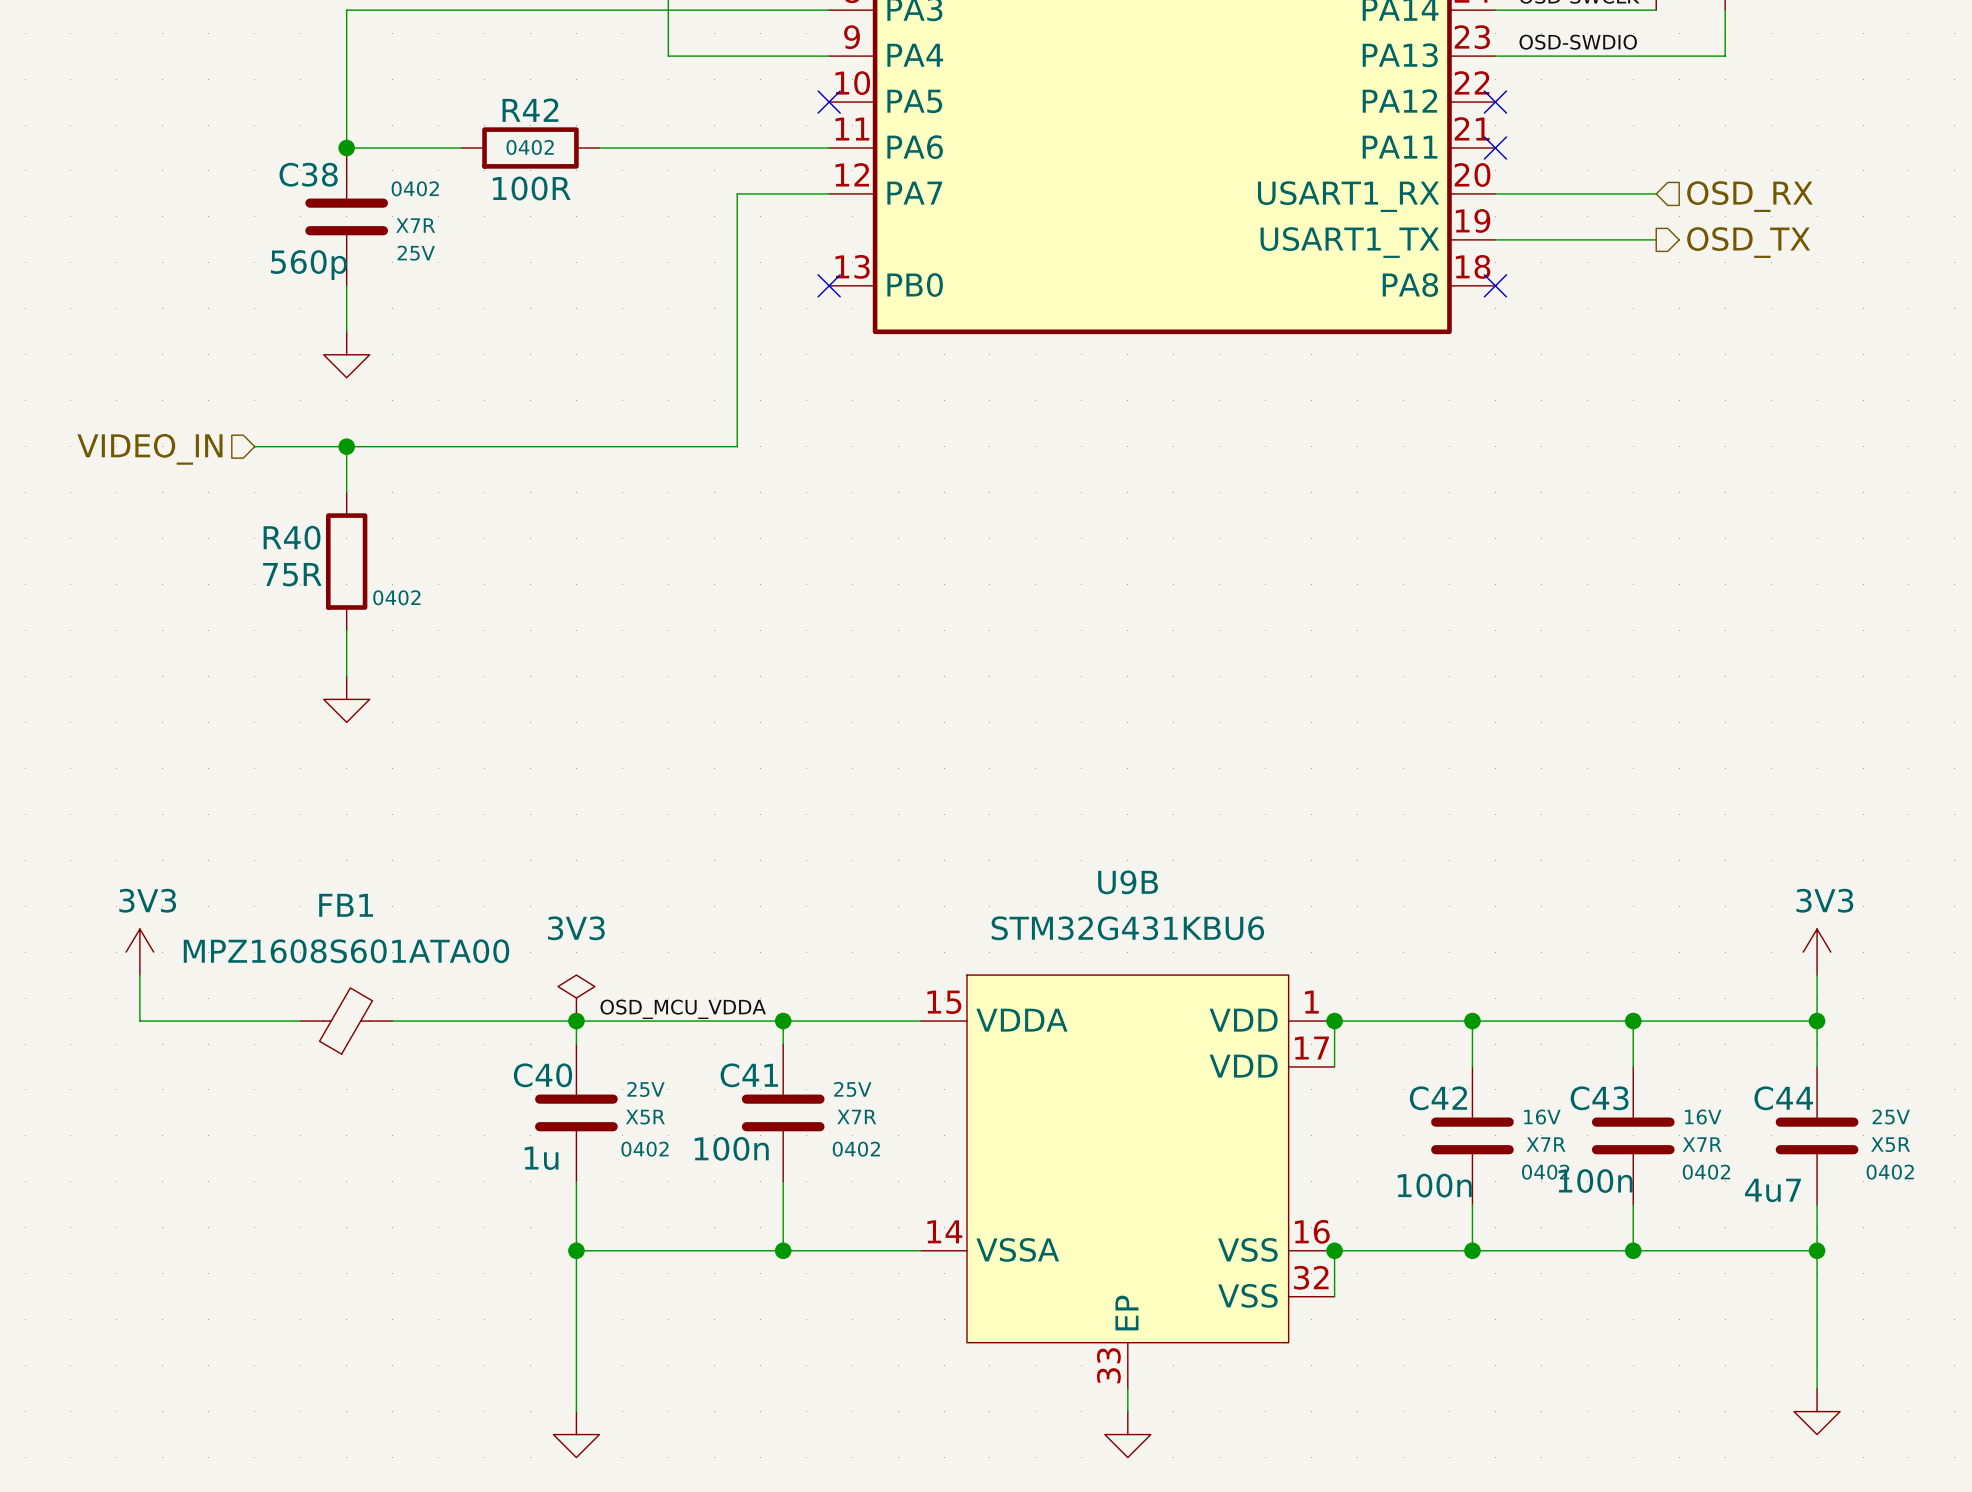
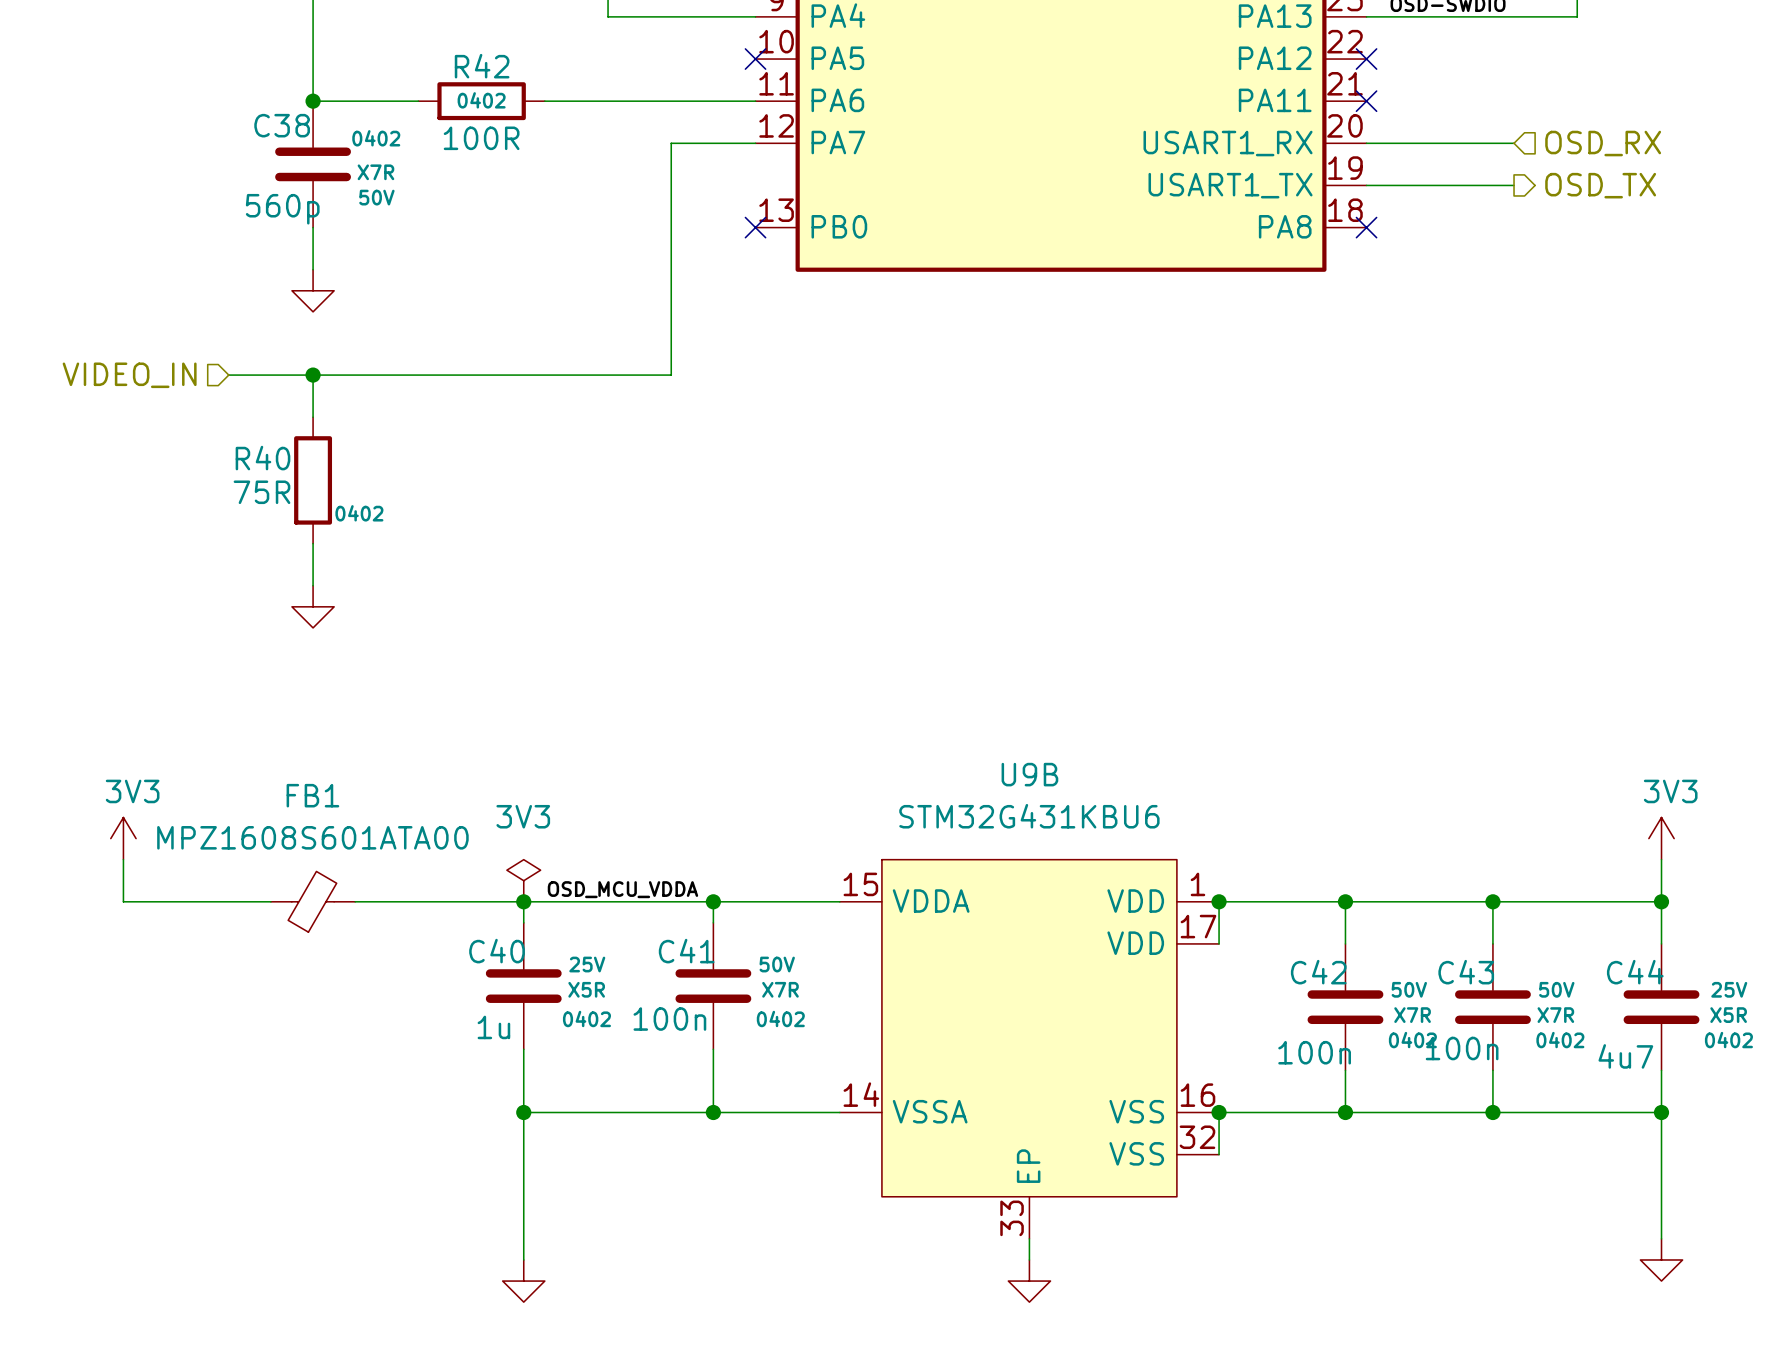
C38 text: 25V (416, 253) -> 50V (376, 197)
C41 text: 25V (852, 1089) -> 50V (777, 964)
C42 text: 16V (1542, 1117) -> 50V (1409, 989)
C43 text: 16V (1703, 1117) -> 50V (1556, 989)

